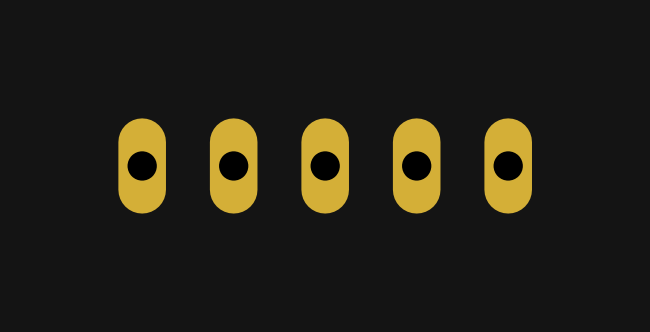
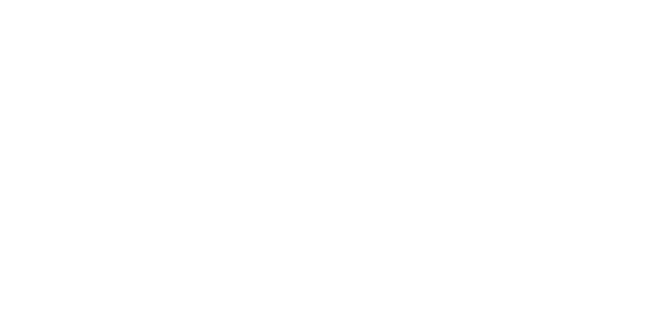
part: (325, 165) -> none

